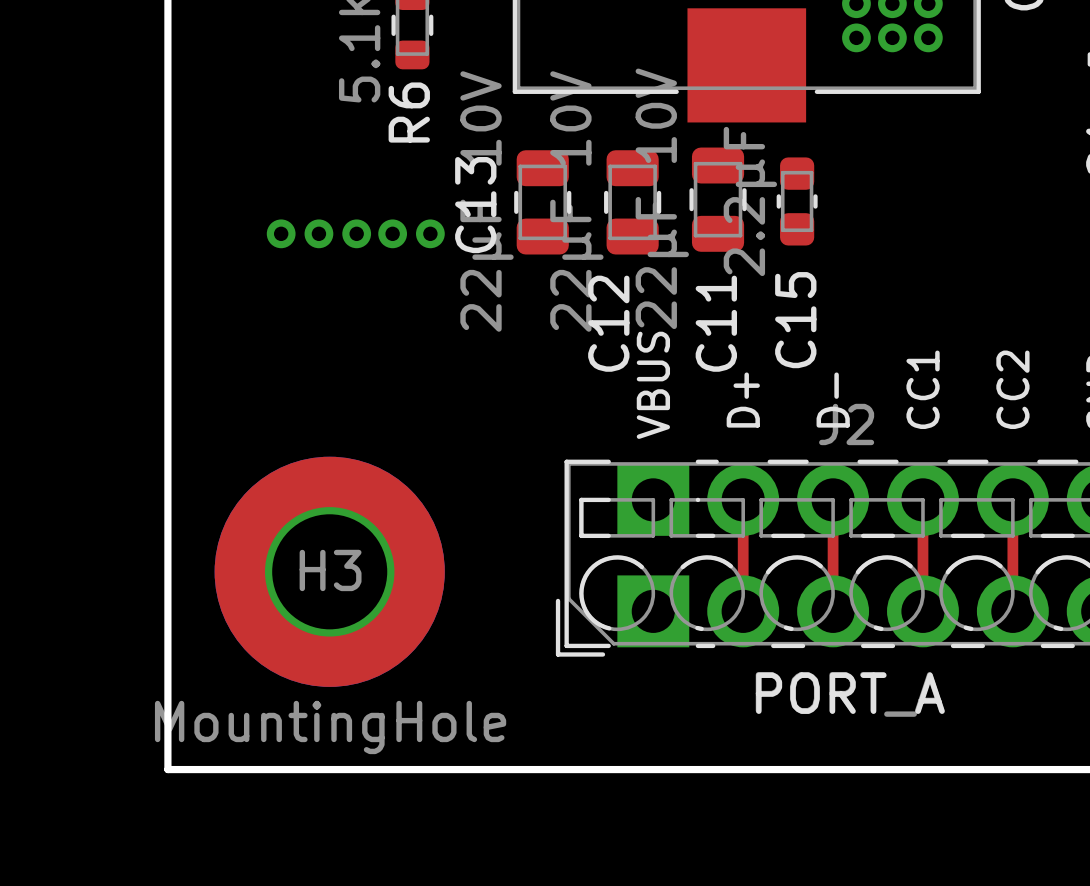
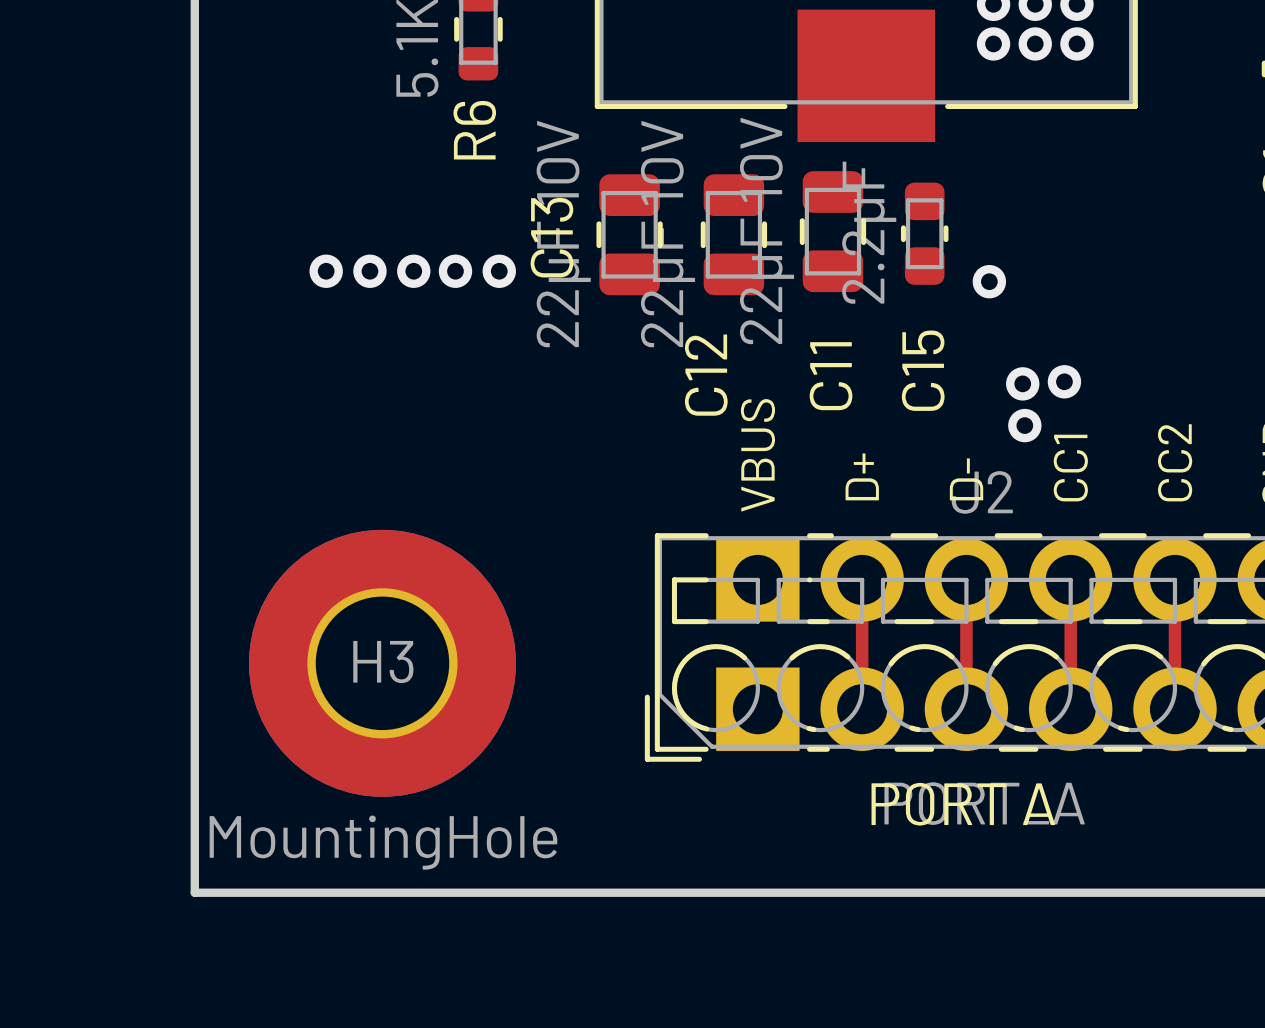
via: none -> (989, 281)
via: none -> (1064, 381)
via: none -> (1022, 383)
via: none -> (1024, 425)

